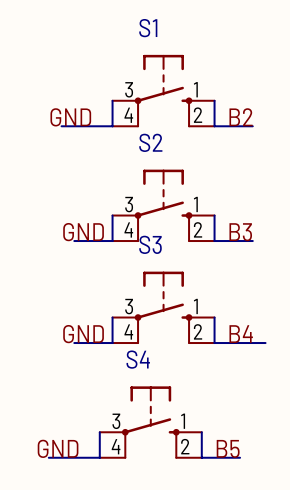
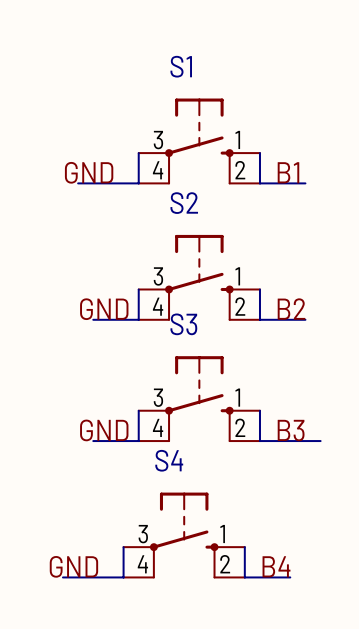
label: B2 (241, 117) -> B1 (288, 172)
label: B3 (240, 232) -> B2 (291, 309)
label: B4 (241, 334) -> B3 (291, 430)
label: B5 (228, 448) -> B4 (276, 566)

